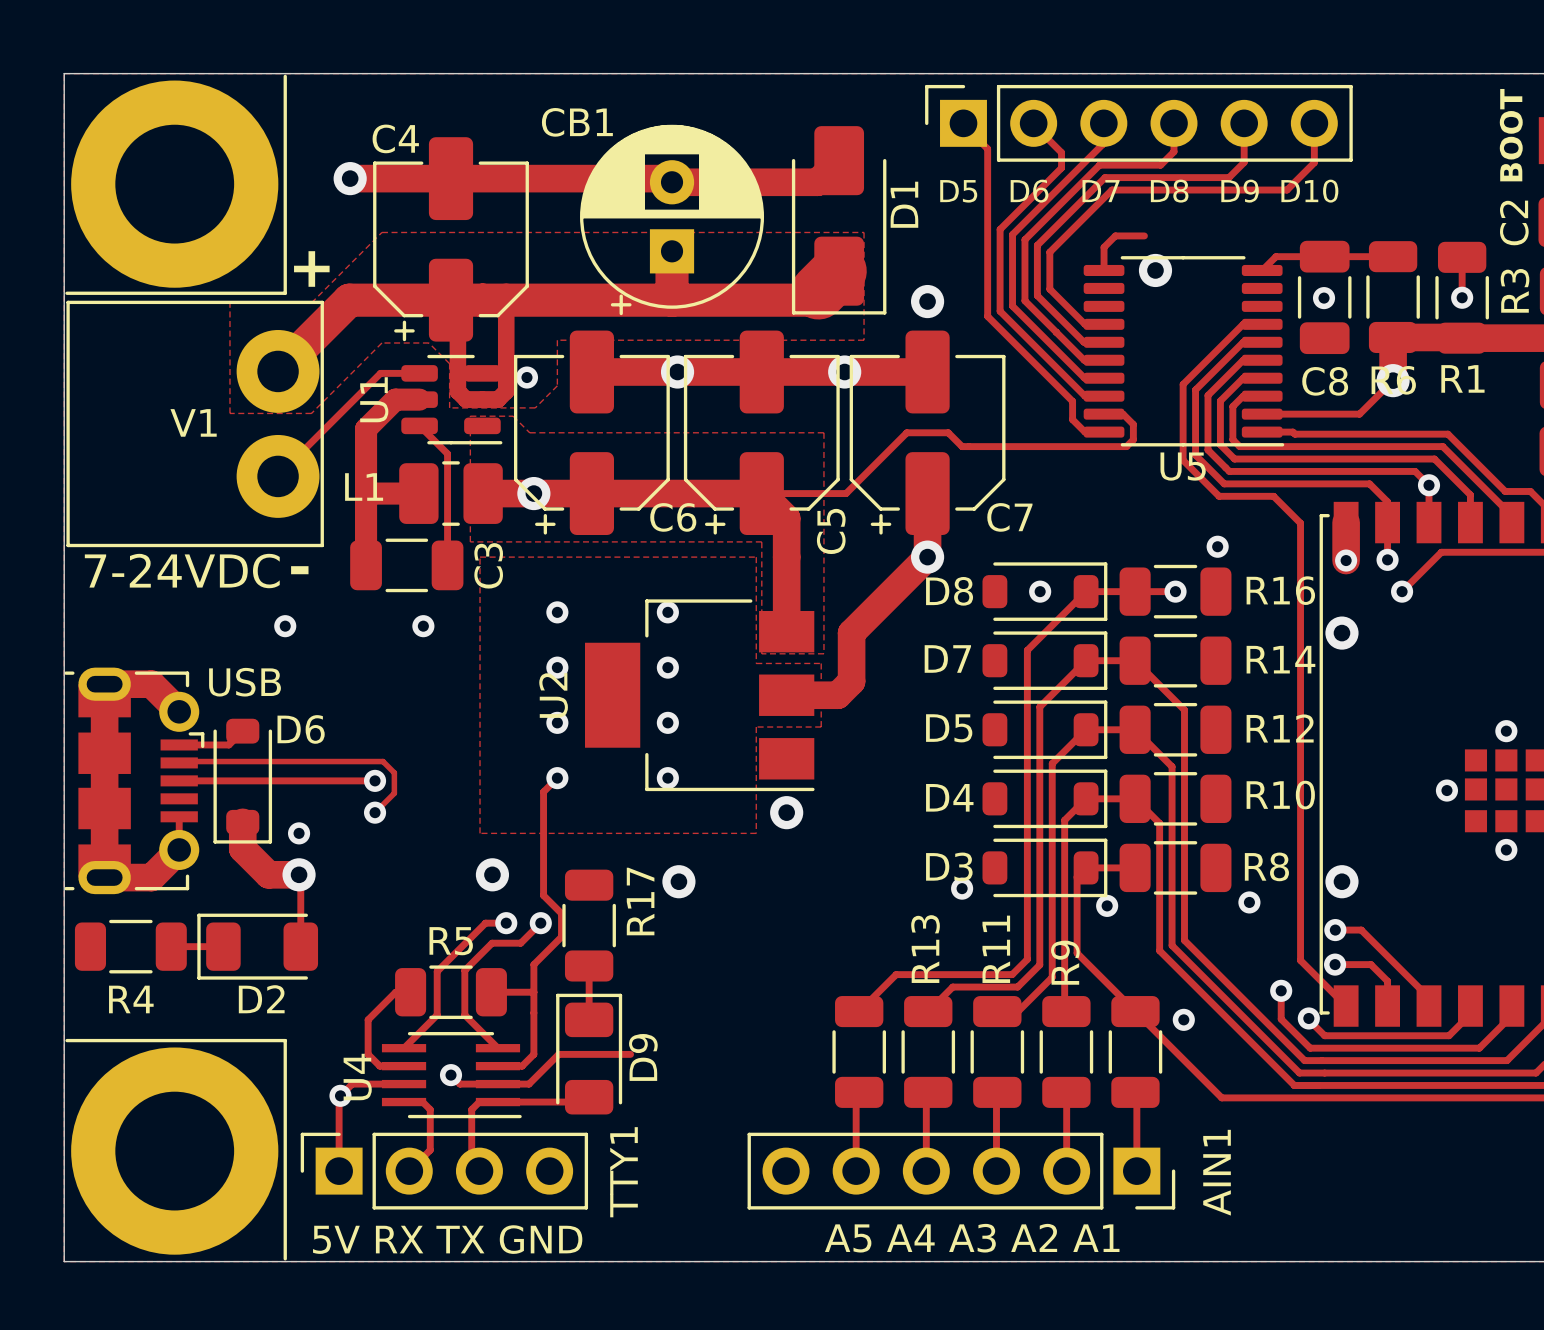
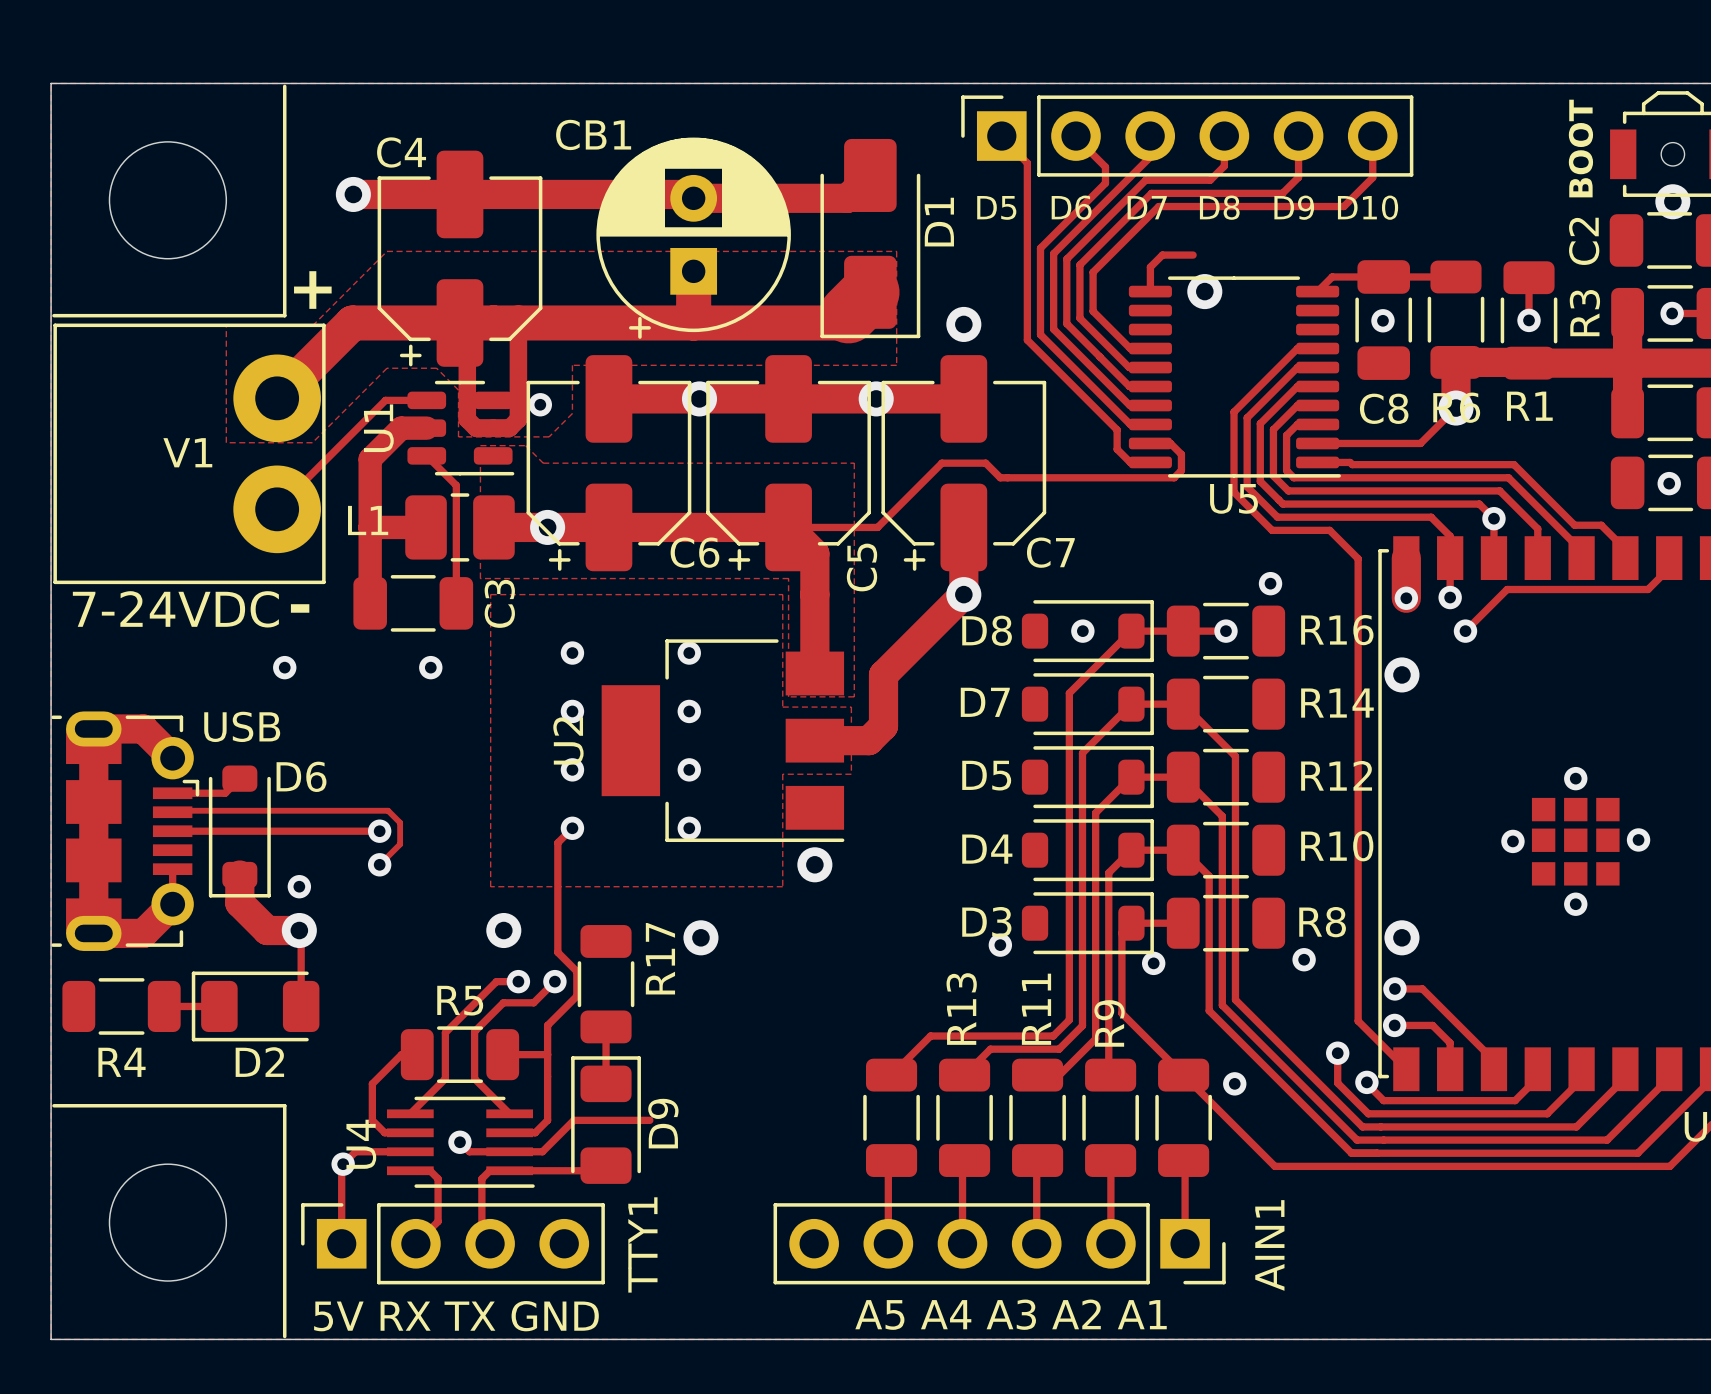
round board edge: none -> [108, 141, 228, 260]
part: (174, 184) -> none
round board edge: none -> [108, 1163, 228, 1282]
part: (174, 1151) -> none

